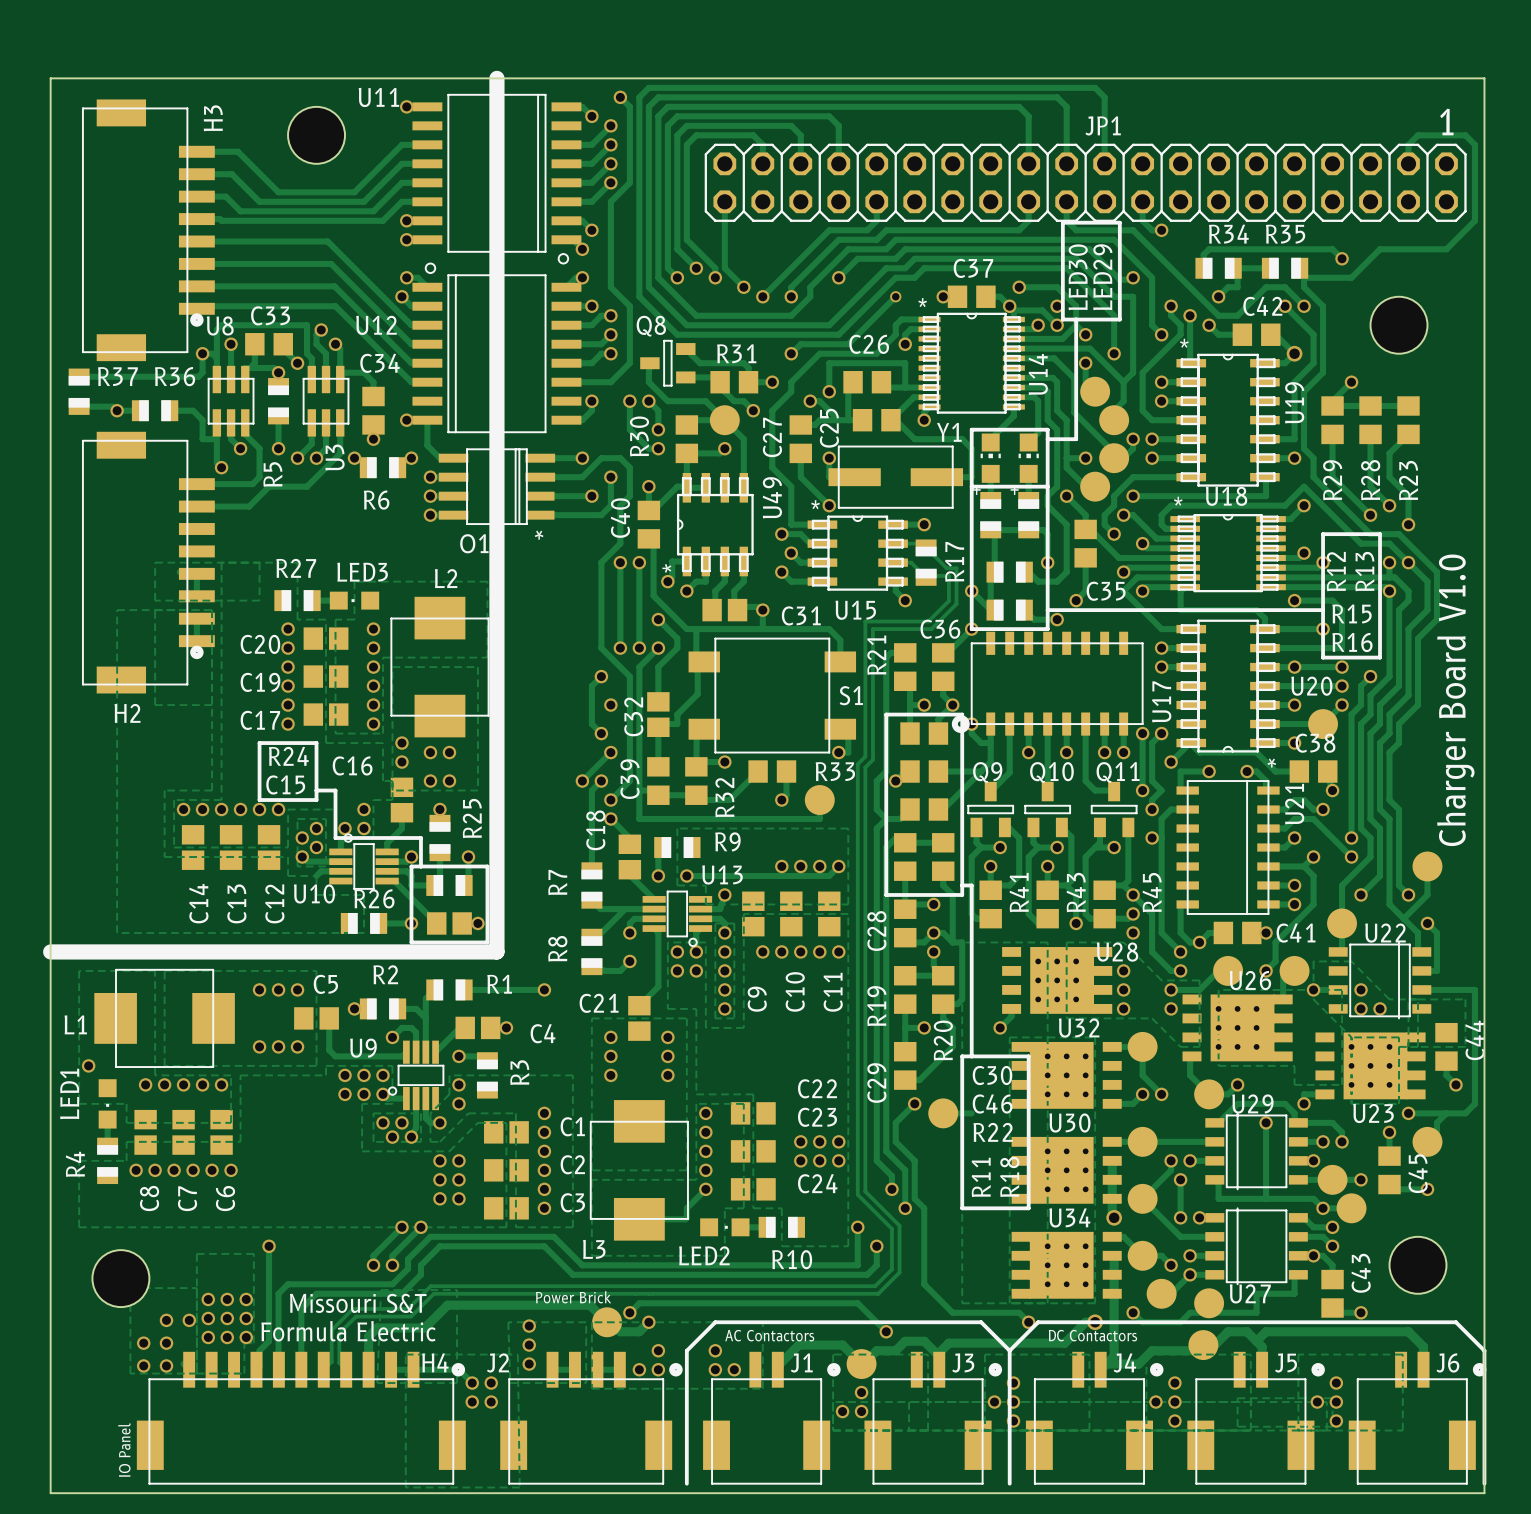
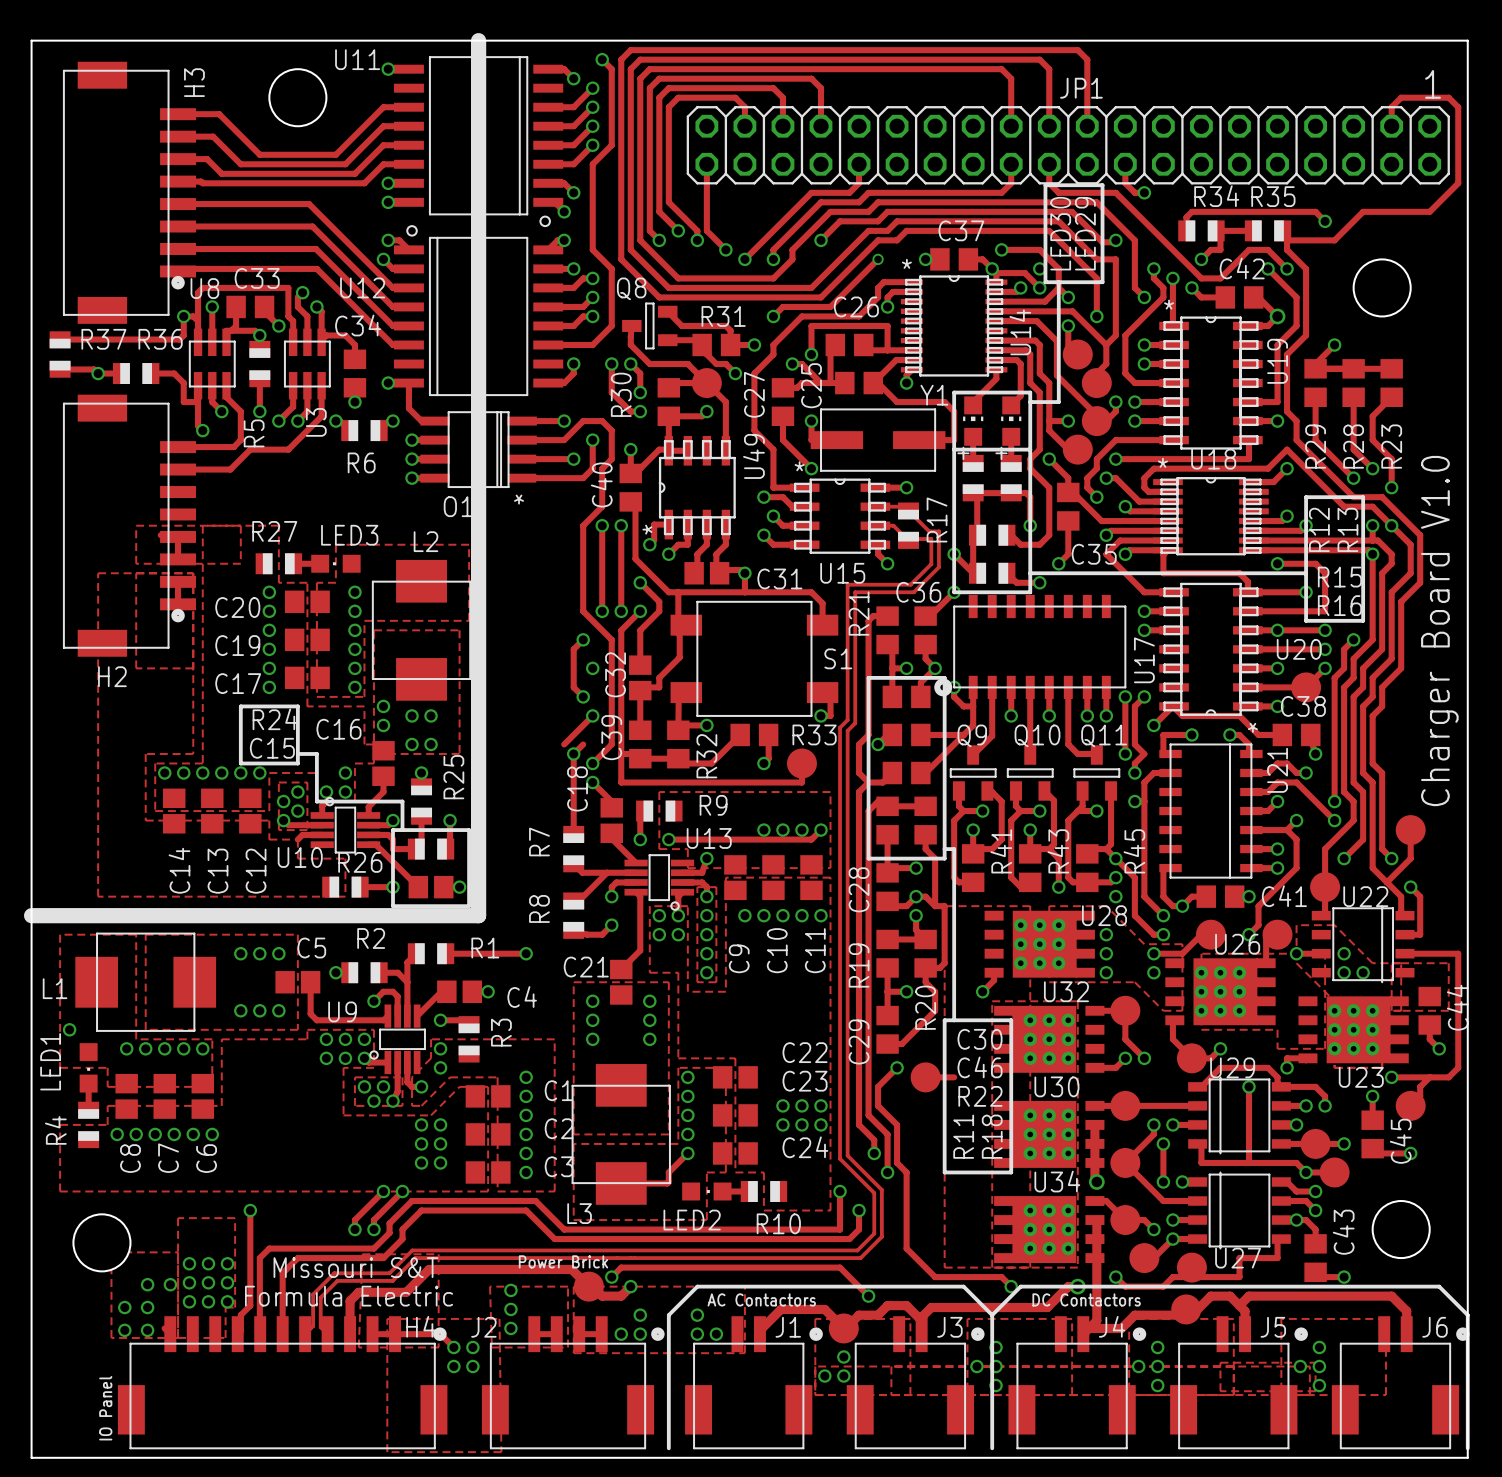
via: (582, 781) -> none
via: (601, 781) -> none
via: none -> (573, 753)

